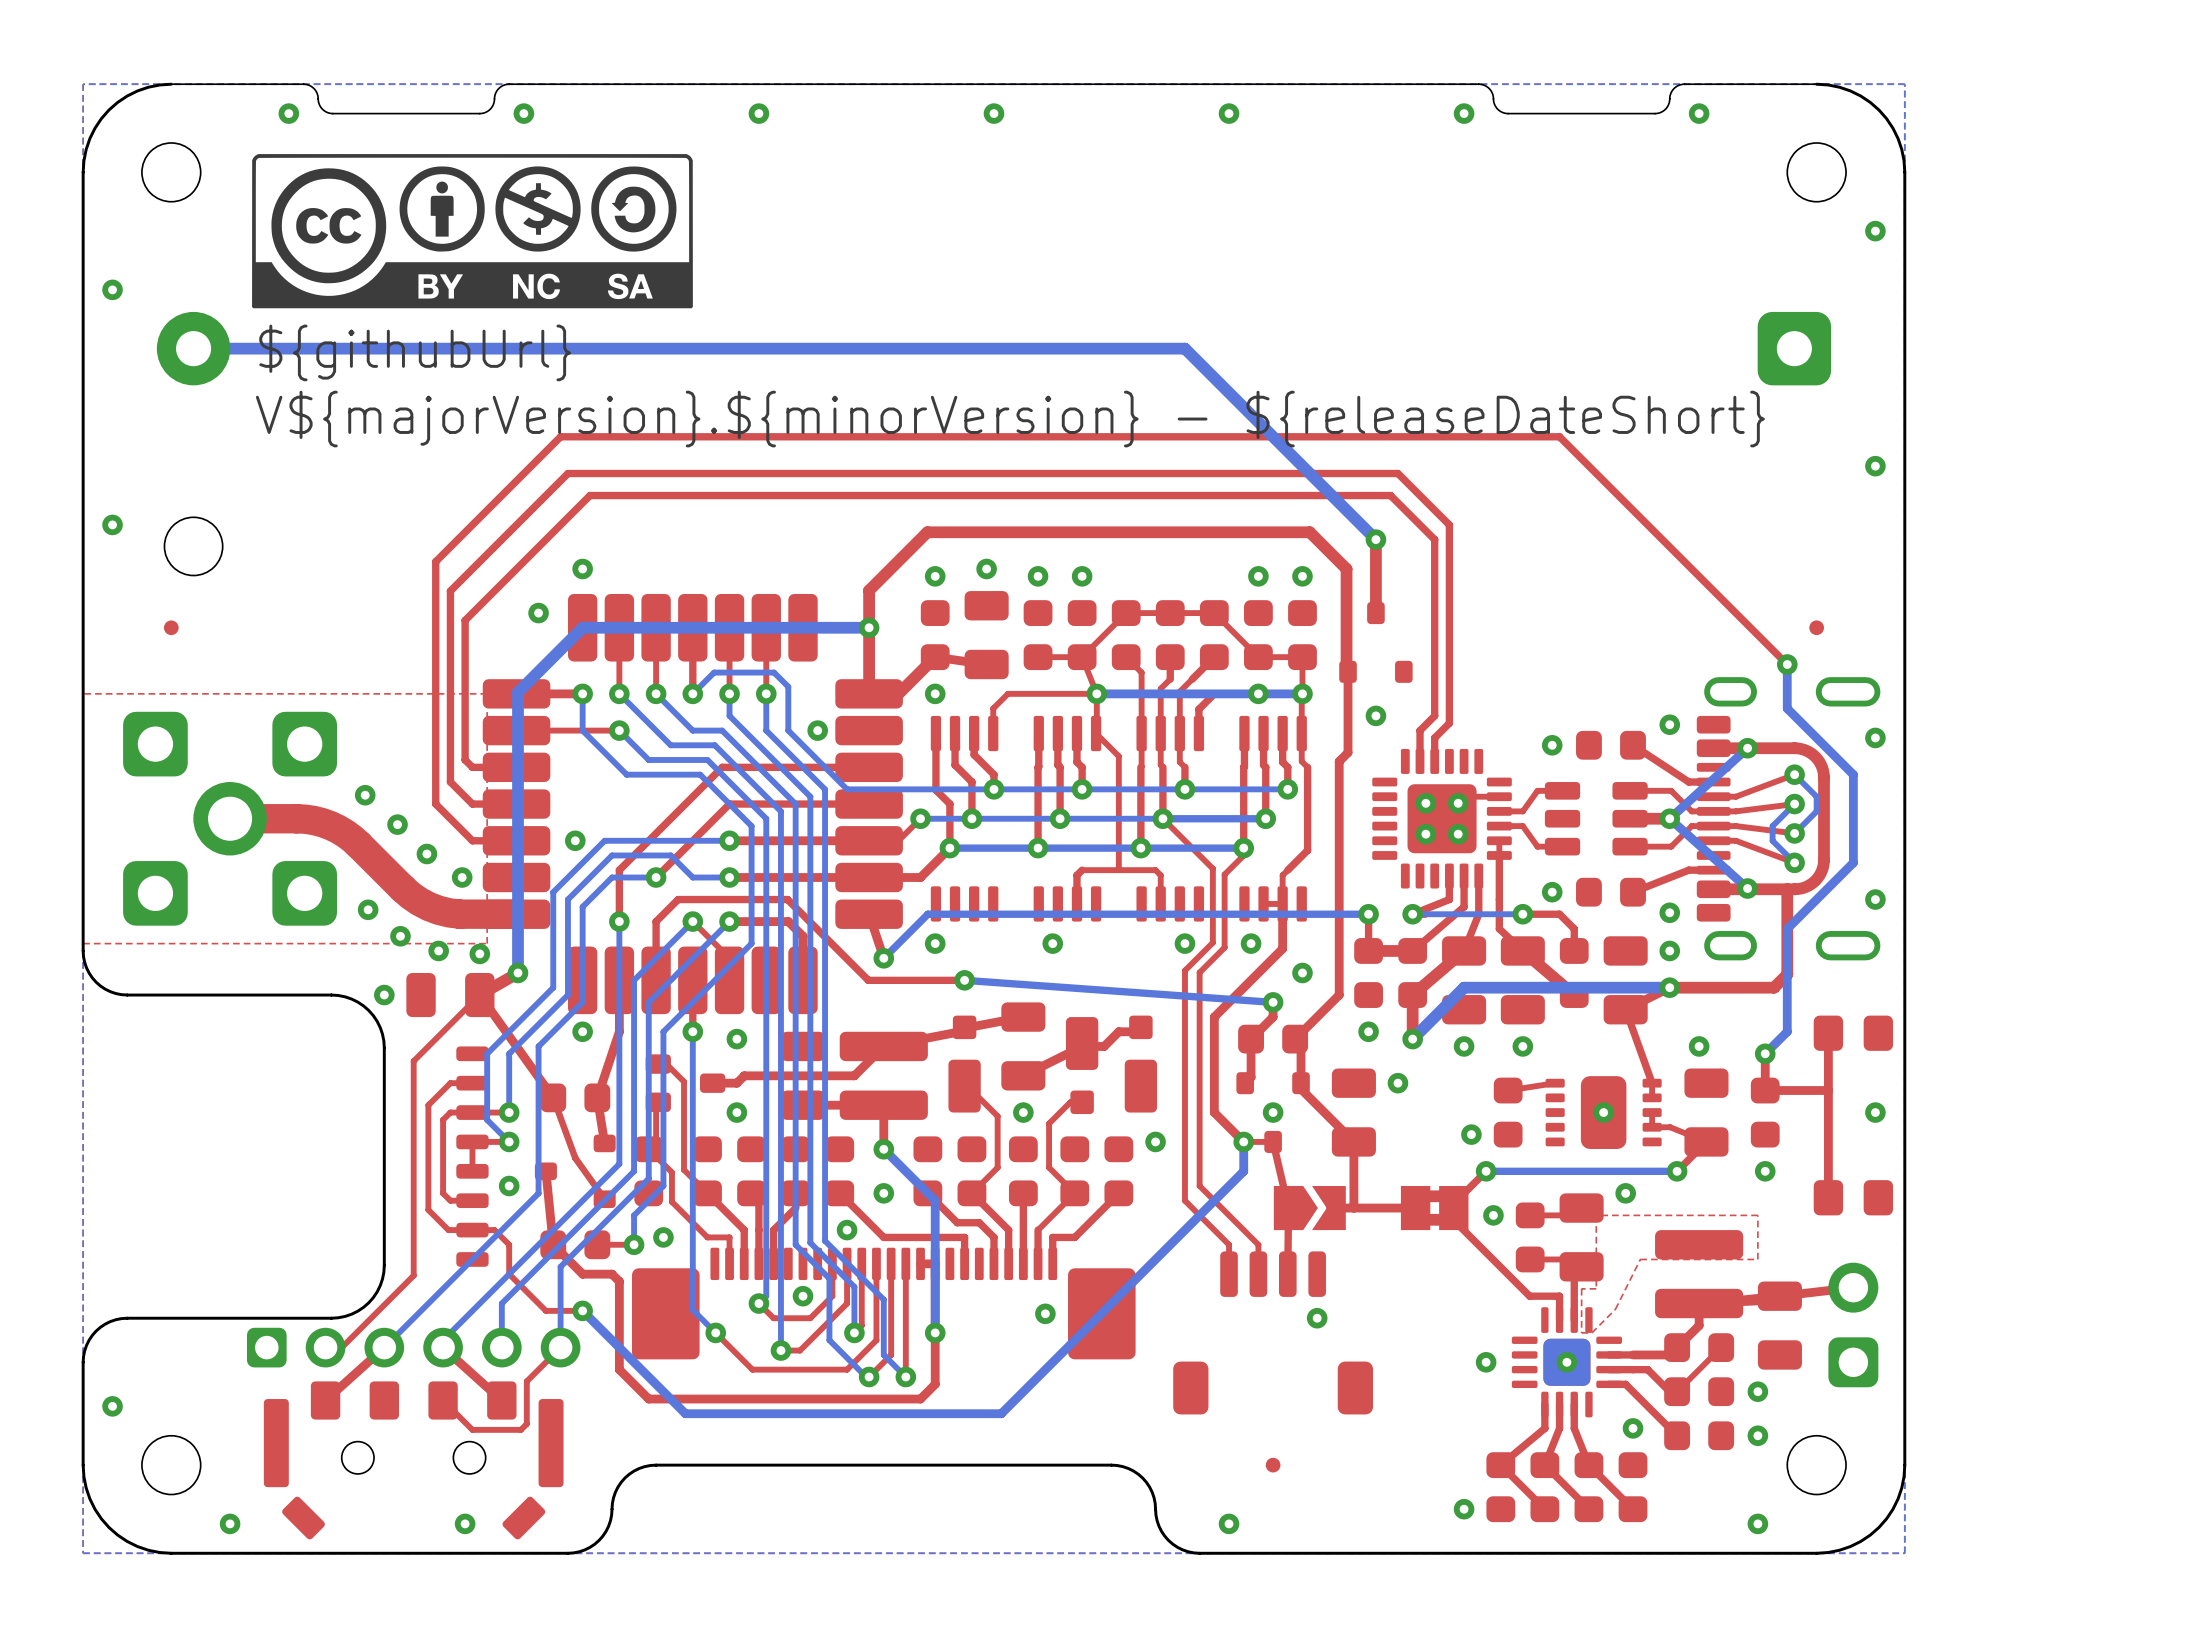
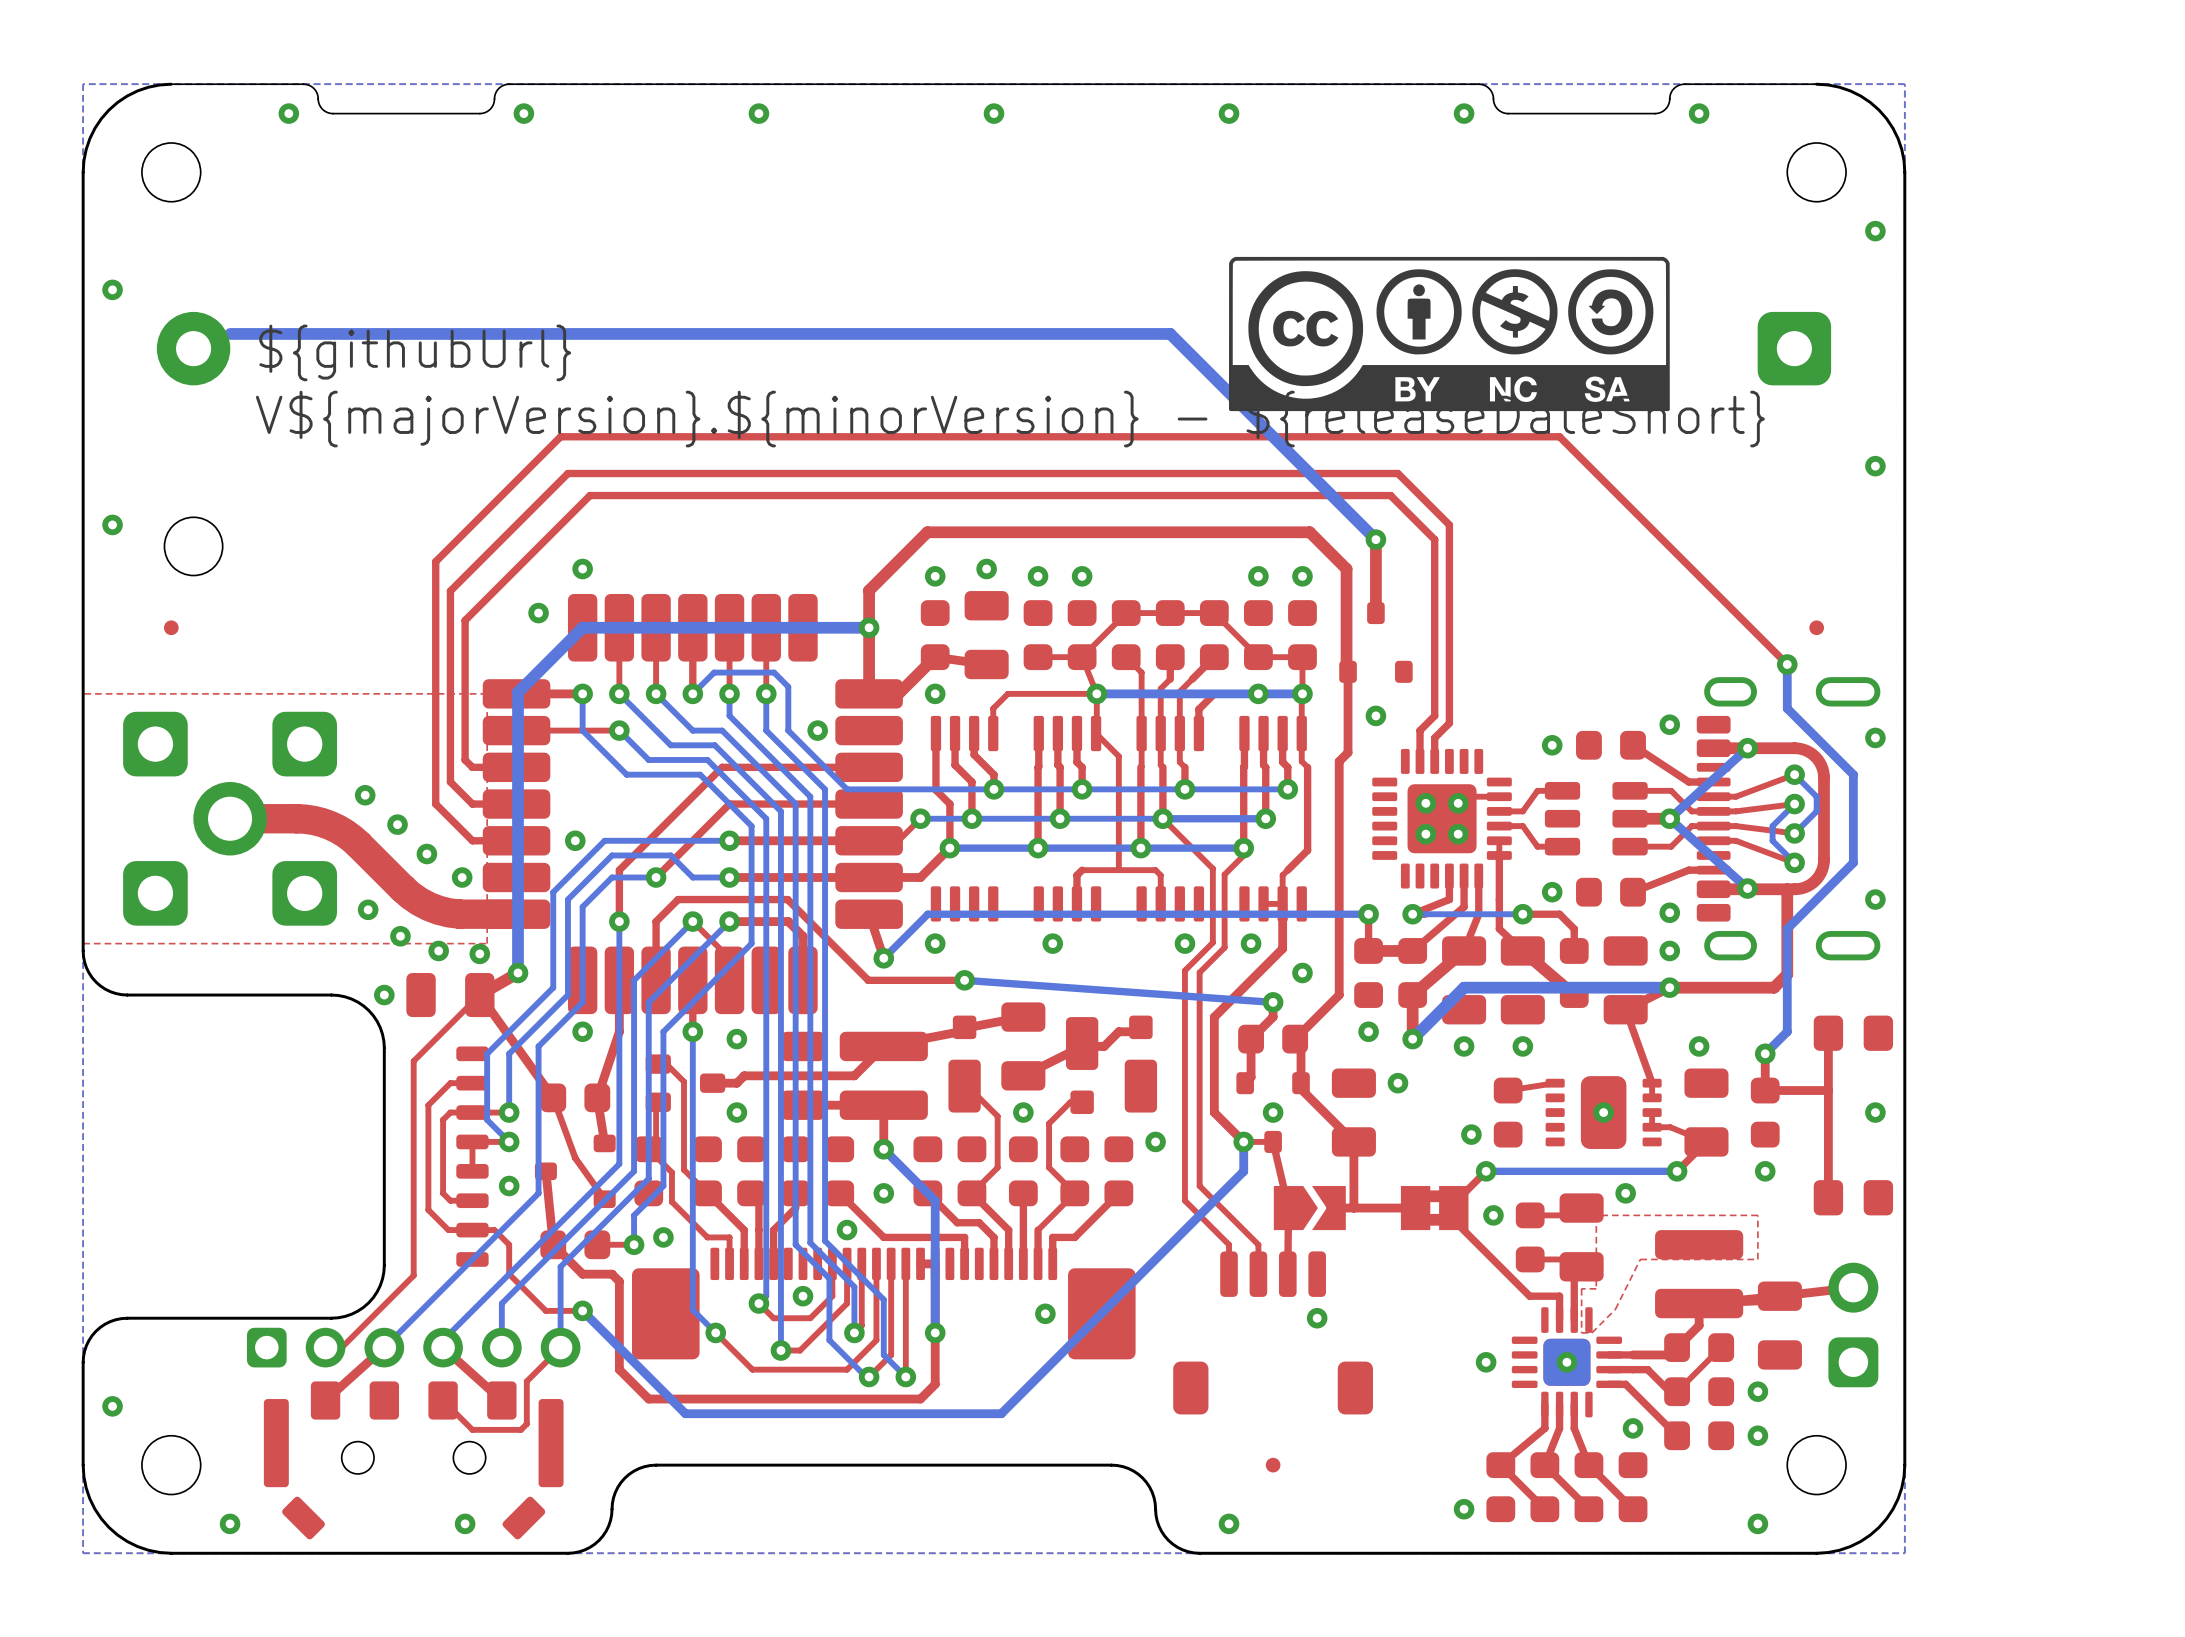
drawing: [252, 154, 693, 309] -> none
drawing: none -> [1228, 256, 1670, 412]
bottom track: (1184, 348) (193, 348) -> (1184, 348) (1170, 333) (230, 333)

